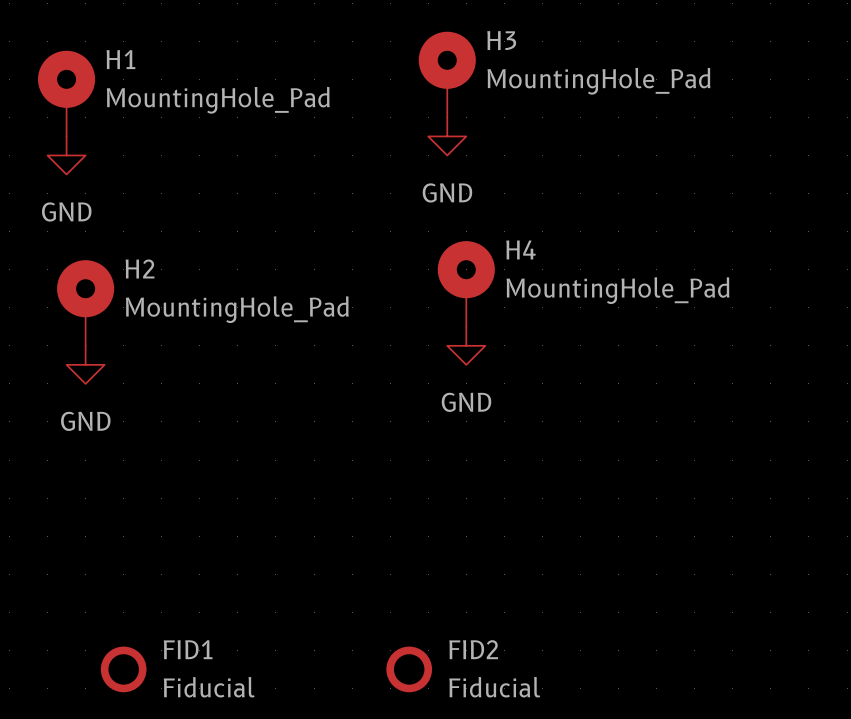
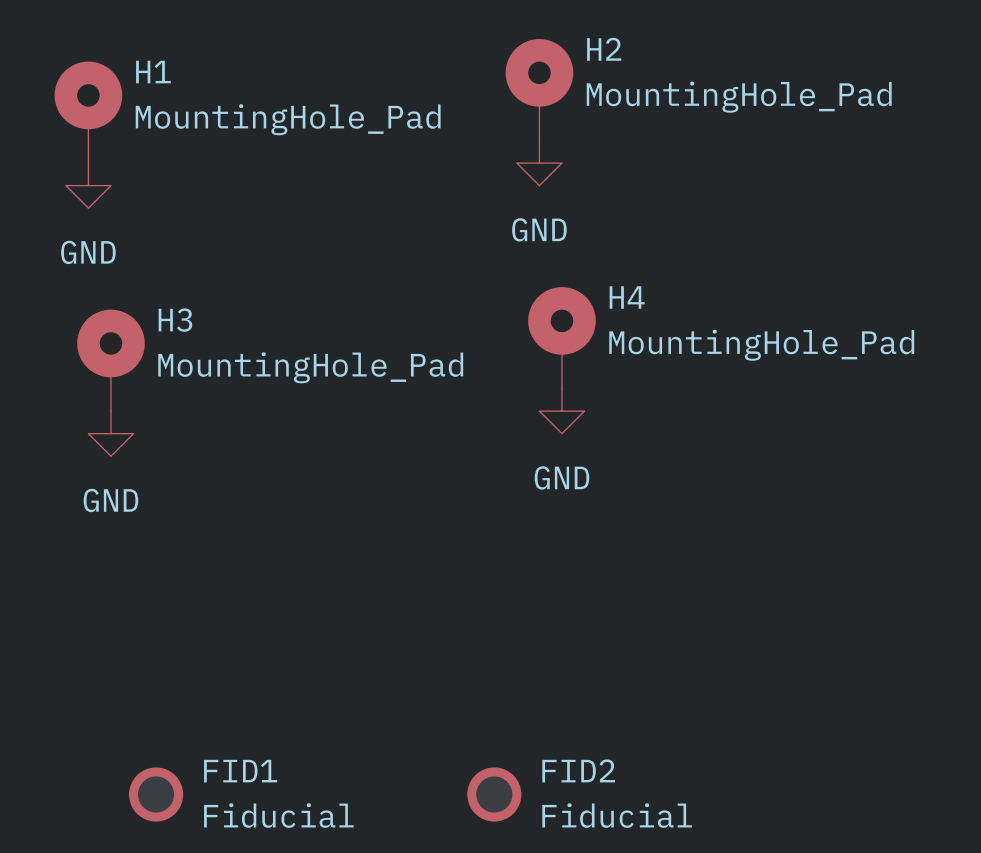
H3 name: H3 (501, 40) -> H2 (604, 49)
H2 name: H2 (140, 268) -> H3 (175, 320)

